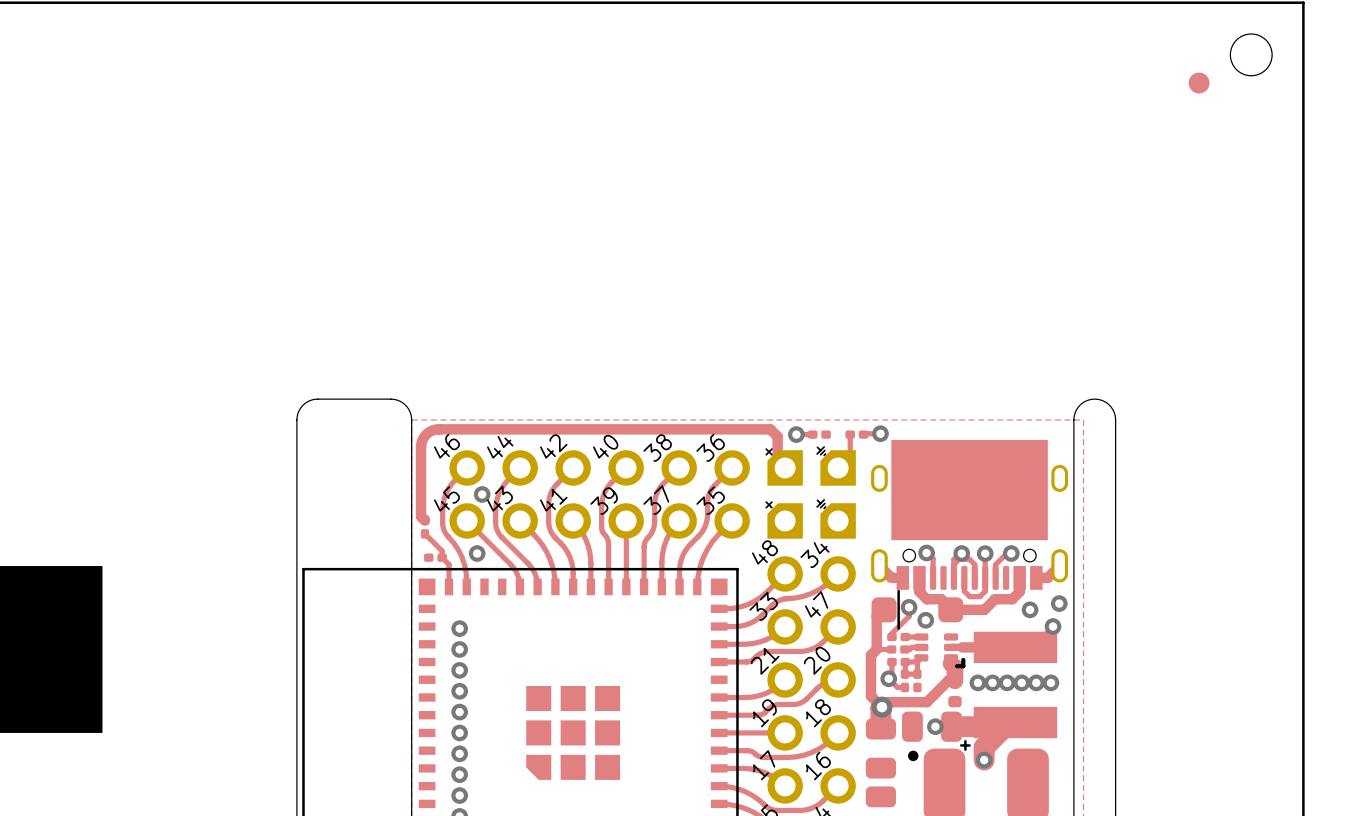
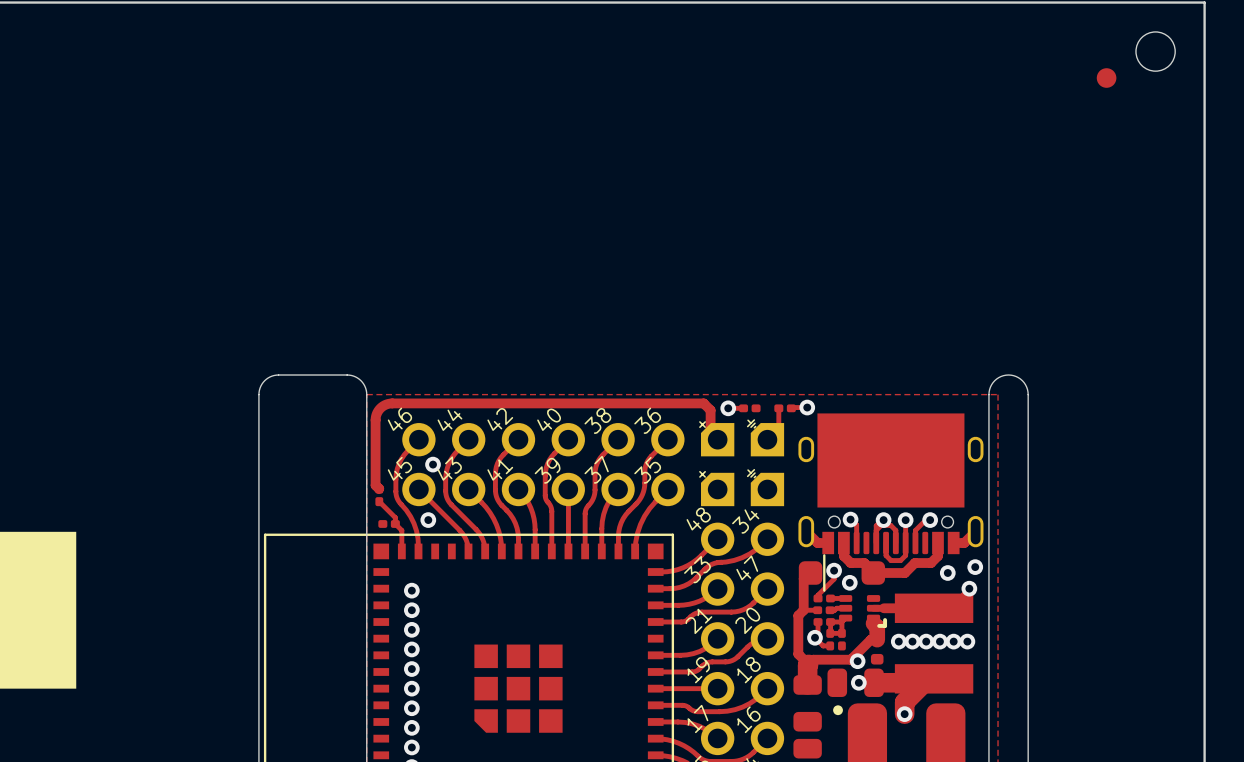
via: none -> (857, 661)
via: (881, 707) -> none
part footprint: [902, 711, 971, 751] -> [827, 668, 884, 697]

